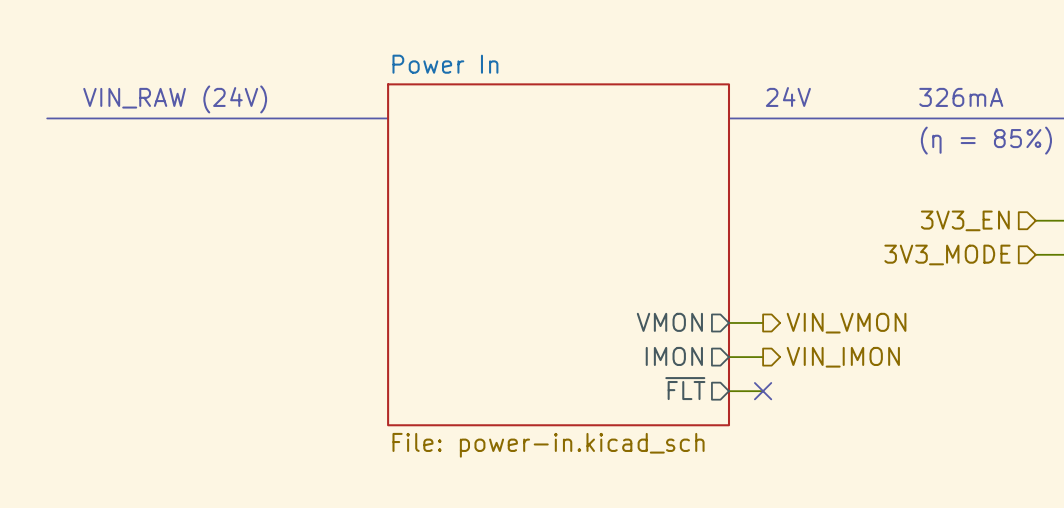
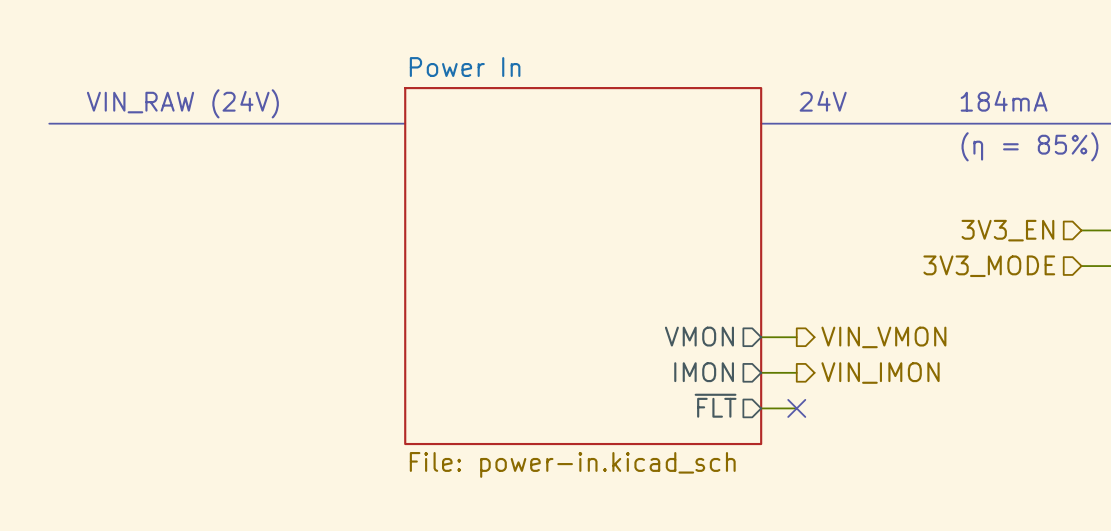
text: 326mA (961, 97) -> 184mA (1004, 101)

